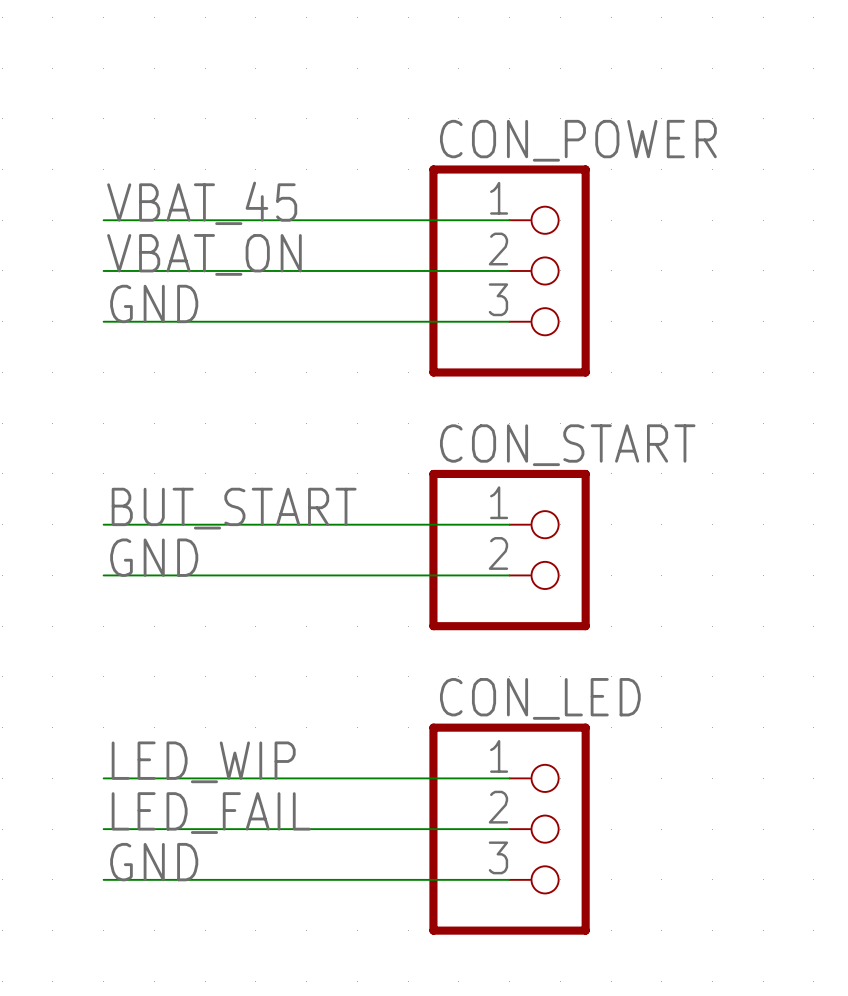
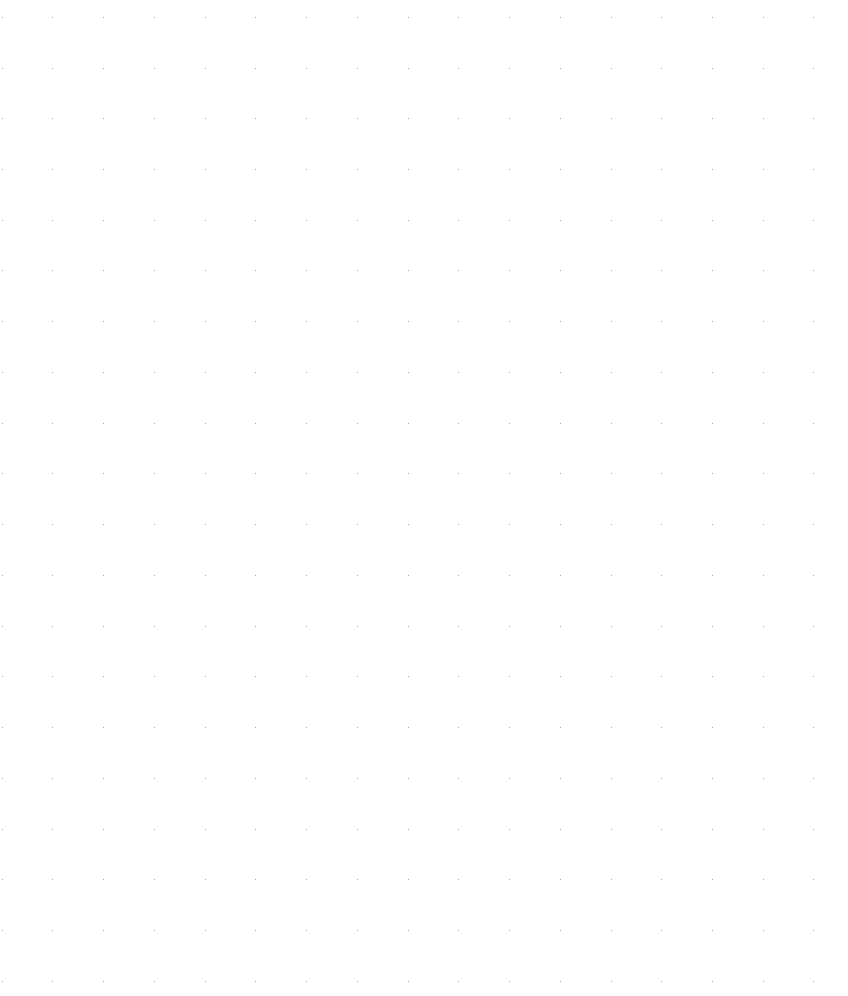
label: VBAT_45 (202, 203) -> none
wire: (103, 220) (509, 220) -> none
label: VBAT_ON (204, 254) -> none
wire: (103, 270) (509, 270) -> none
CON_POWER: (509, 270) -> none
label: GND (154, 303) -> none
wire: (103, 321) (509, 321) -> none
label: BUT_START (234, 508) -> none
wire: (103, 524) (509, 524) -> none
CON_START: (509, 550) -> none
label: GND (154, 557) -> none
wire: (103, 575) (509, 575) -> none
label: LED_WIP (203, 762) -> none
wire: (103, 778) (509, 778) -> none
label: LED_FAIL (211, 813) -> none
wire: (103, 829) (509, 829) -> none
CON_LED: (509, 829) -> none
label: GND (154, 862) -> none
wire: (103, 879) (509, 879) -> none

